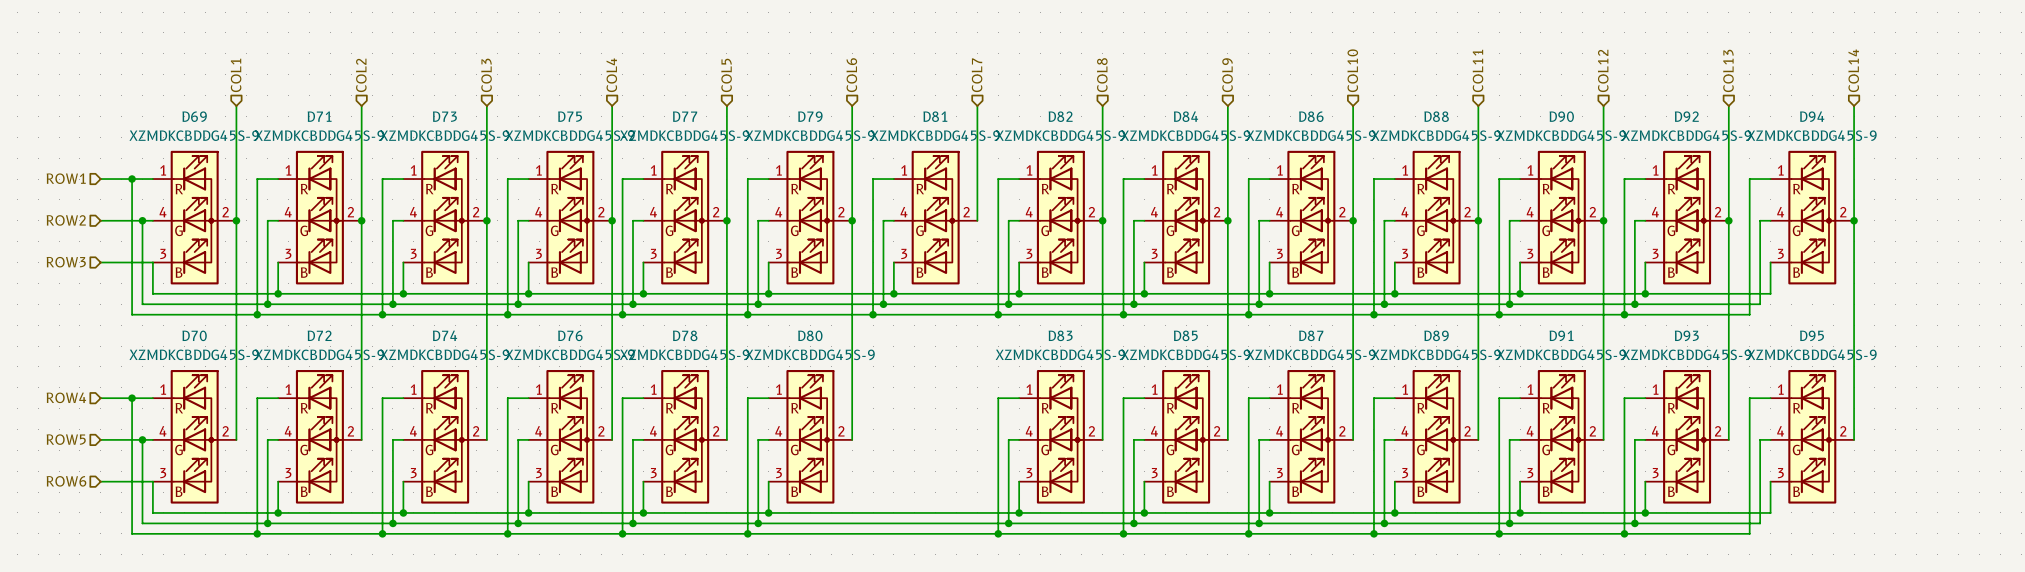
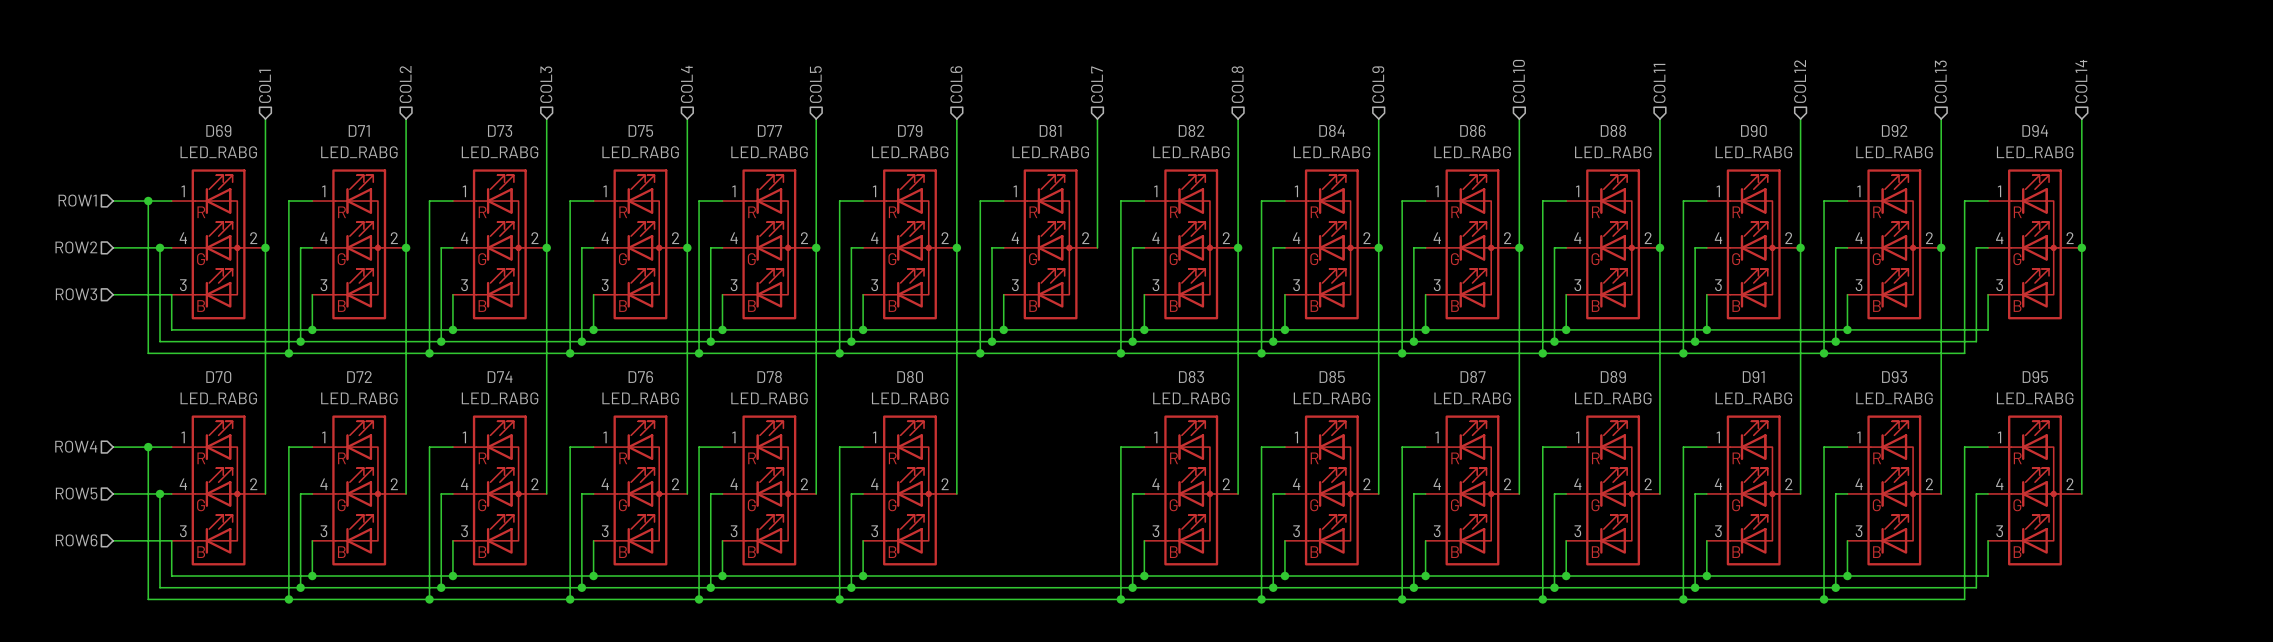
D69 value: XZMDKCBDDG45S-9 (194, 135) -> LED_RABG (218, 152)
D71 value: XZMDKCBDDG45S-9 (319, 135) -> LED_RABG (359, 152)
D73 value: XZMDKCBDDG45S-9 (444, 135) -> LED_RABG (500, 152)
D75 value: XZMDKCBDDG45S-9 (569, 135) -> LED_RABG (640, 152)
D77 value: XZMDKCBDDG45S-9 (684, 135) -> LED_RABG (769, 152)
D79 value: XZMDKCBDDG45S-9 (809, 135) -> LED_RABG (910, 152)
D81 value: XZMDKCBDDG45S-9 (935, 135) -> LED_RABG (1050, 152)
D82 value: XZMDKCBDDG45S-9 (1060, 135) -> LED_RABG (1191, 152)
D84 value: XZMDKCBDDG45S-9 (1185, 135) -> LED_RABG (1332, 152)
D86 value: XZMDKCBDDG45S-9 (1310, 135) -> LED_RABG (1472, 152)
D88 value: XZMDKCBDDG45S-9 (1436, 135) -> LED_RABG (1613, 152)
D90 value: XZMDKCBDDG45S-9 (1561, 135) -> LED_RABG (1753, 152)
D92 value: XZMDKCBDDG45S-9 (1686, 135) -> LED_RABG (1894, 152)
D94 value: XZMDKCBDDG45S-9 (1811, 135) -> LED_RABG (2035, 152)
D70 value: XZMDKCBDDG45S-9 (194, 354) -> LED_RABG (218, 398)
D72 value: XZMDKCBDDG45S-9 (319, 354) -> LED_RABG (359, 398)
D74 value: XZMDKCBDDG45S-9 (444, 354) -> LED_RABG (500, 398)
D76 value: XZMDKCBDDG45S-9 (569, 354) -> LED_RABG (640, 398)
D78 value: XZMDKCBDDG45S-9 (684, 354) -> LED_RABG (769, 398)
D80 value: XZMDKCBDDG45S-9 (809, 354) -> LED_RABG (910, 398)
D83 value: XZMDKCBDDG45S-9 (1060, 354) -> LED_RABG (1191, 398)
D85 value: XZMDKCBDDG45S-9 (1185, 354) -> LED_RABG (1332, 398)
D87 value: XZMDKCBDDG45S-9 (1310, 354) -> LED_RABG (1472, 398)
D89 value: XZMDKCBDDG45S-9 (1436, 354) -> LED_RABG (1613, 398)
D91 value: XZMDKCBDDG45S-9 (1561, 354) -> LED_RABG (1753, 398)
D93 value: XZMDKCBDDG45S-9 (1686, 354) -> LED_RABG (1894, 398)
D95 value: XZMDKCBDDG45S-9 (1811, 354) -> LED_RABG (2035, 398)

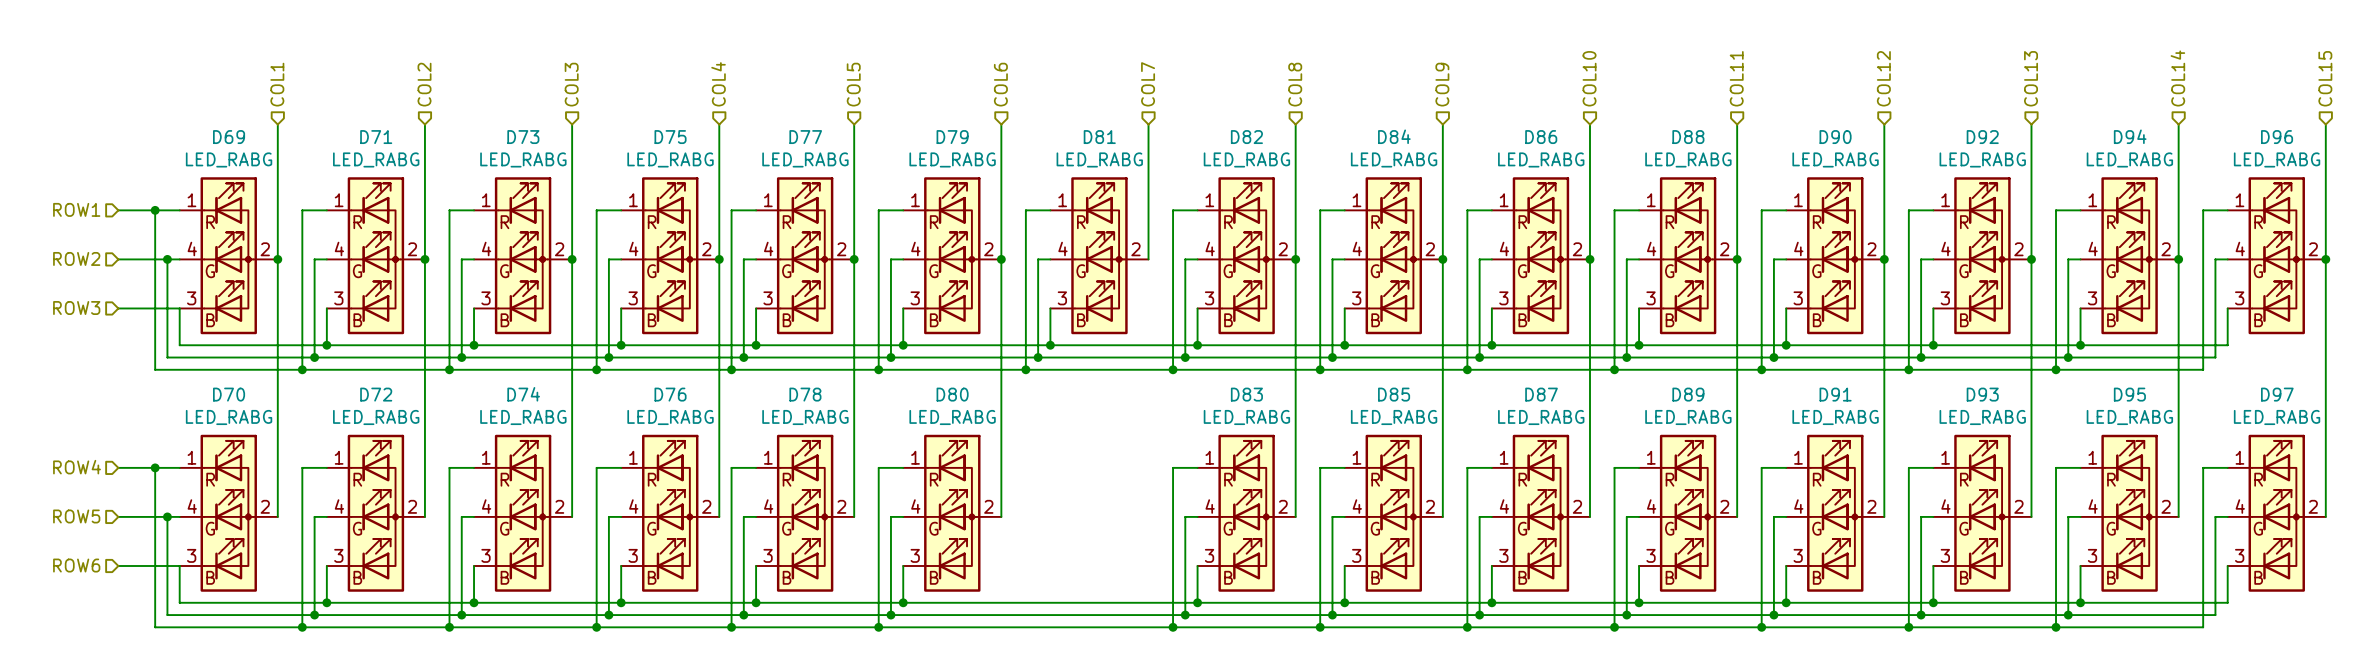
hierarchical label: none -> COL15 (2325, 78)
wire: none -> (2325, 124) (2325, 516)
wire: none -> (2227, 210) (2203, 210) (2203, 369) (2056, 369)
D96: none -> LED_RABG (2276, 255)
wire: none -> (2227, 259) (2215, 259) (2215, 357) (2068, 357)
junction: none -> (2325, 259)
wire: none -> (2227, 308) (2227, 345) (2080, 345)
junction: none -> (2080, 345)
junction: none -> (2068, 357)
junction: none -> (2056, 369)
wire: none -> (2227, 467) (2203, 467) (2203, 627) (2056, 627)
D97: none -> LED_RABG (2276, 513)
wire: none -> (2227, 516) (2215, 516) (2215, 615) (2068, 615)
wire: none -> (2227, 566) (2227, 602) (2080, 602)
junction: none -> (2080, 602)
junction: none -> (2068, 615)
junction: none -> (2056, 627)

